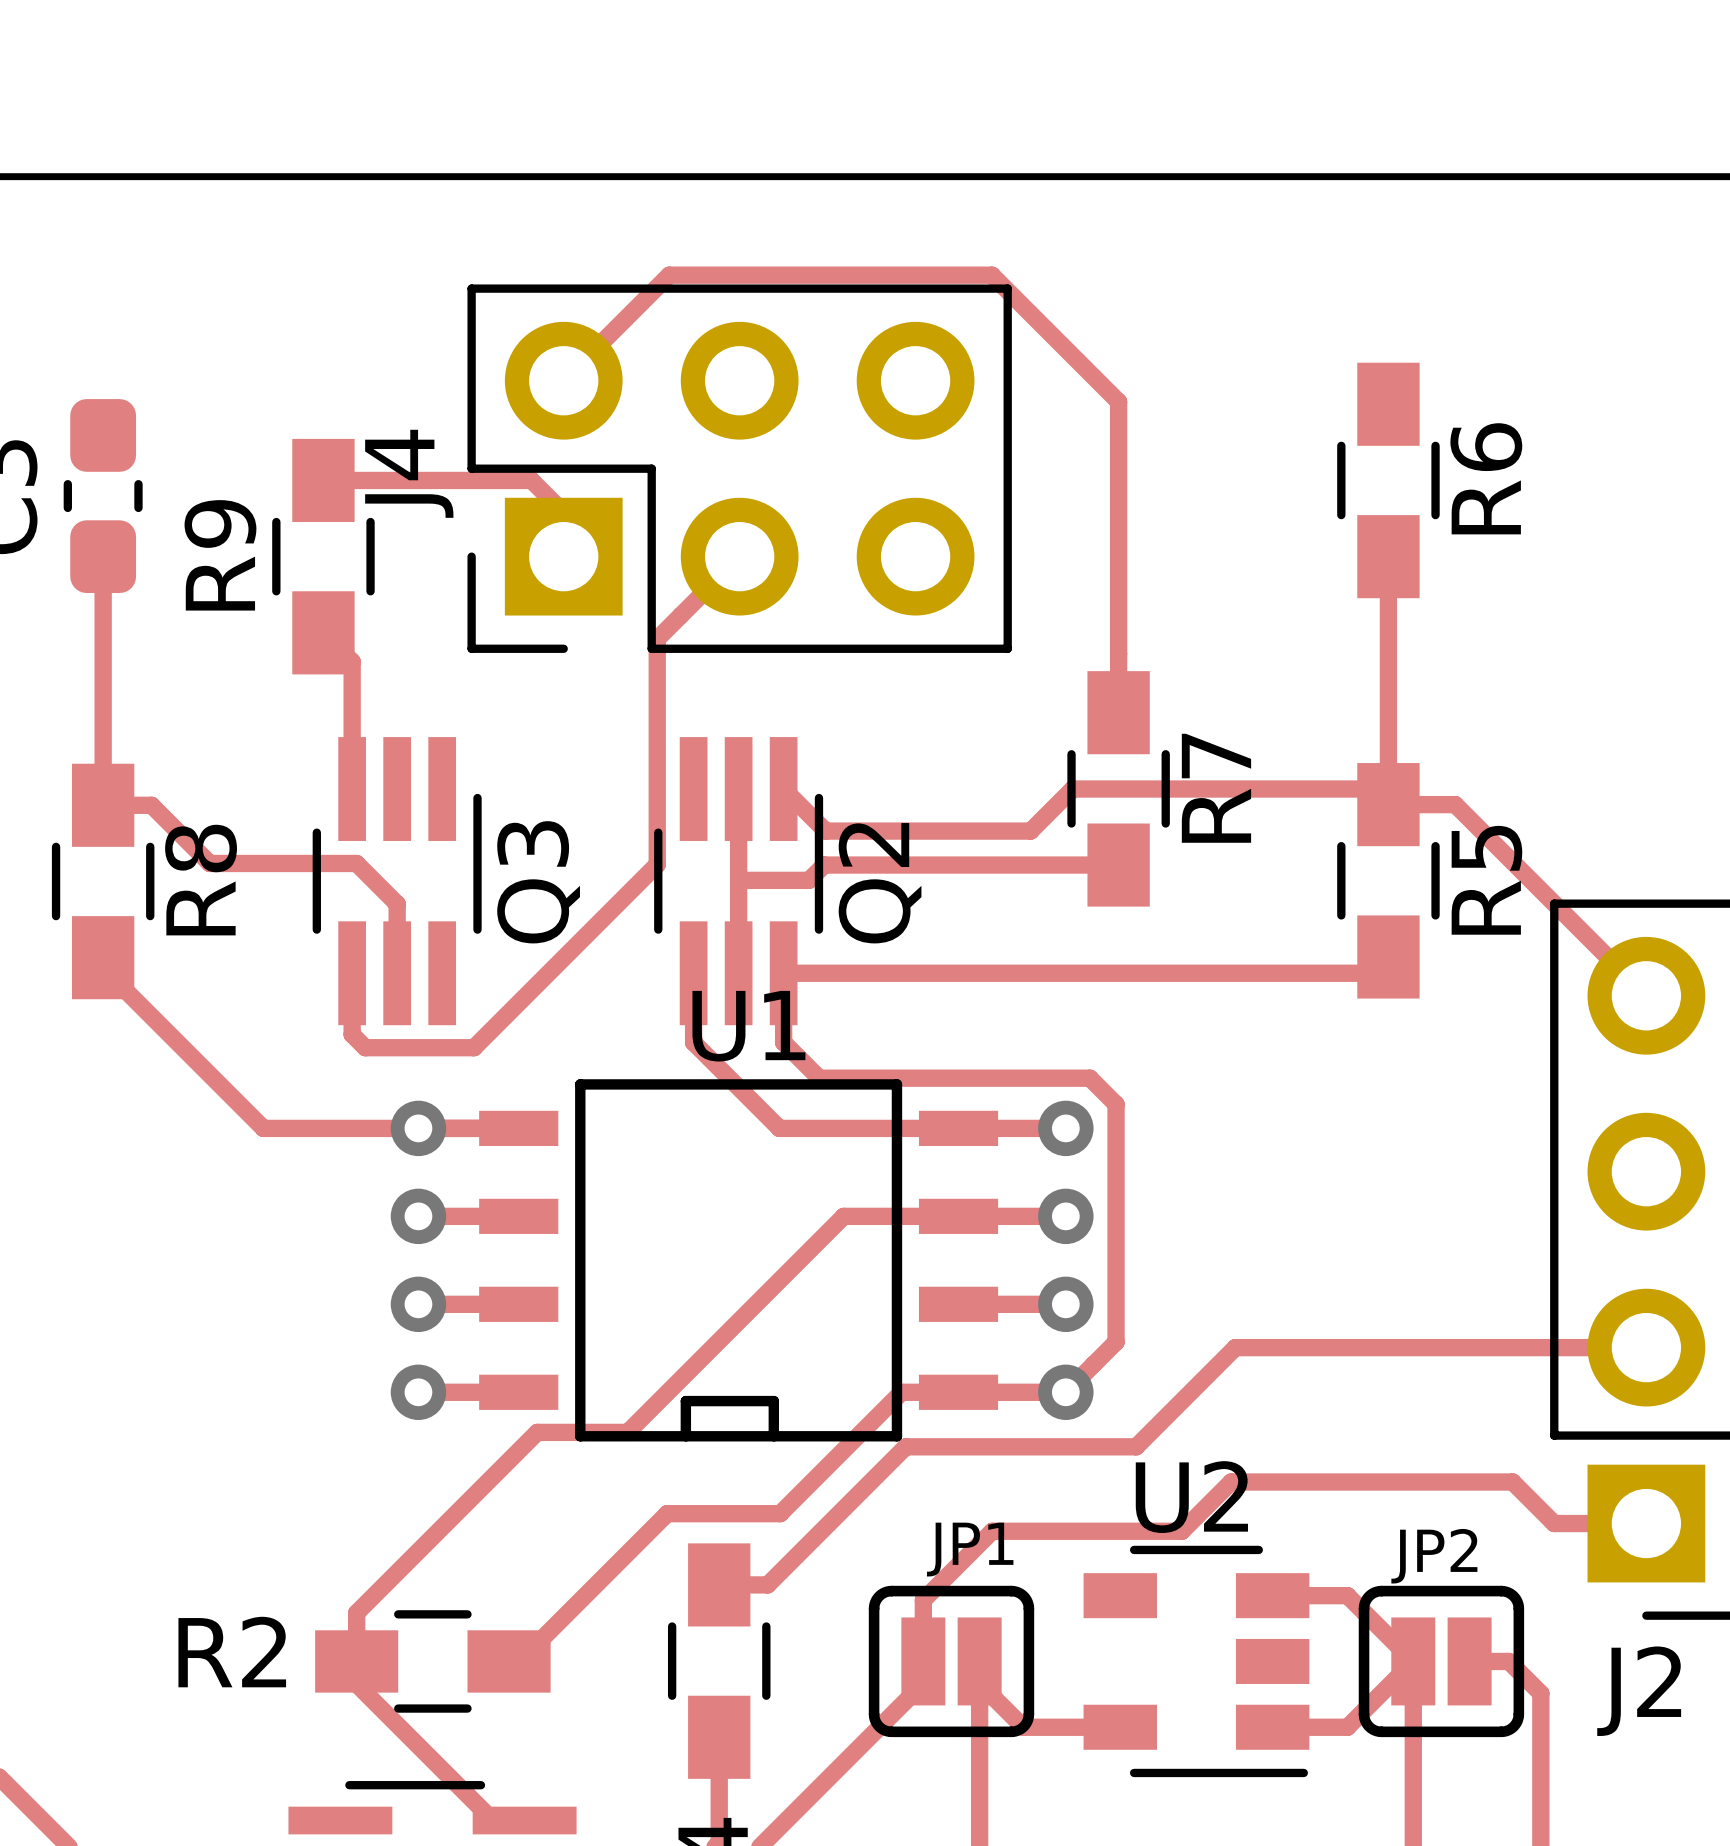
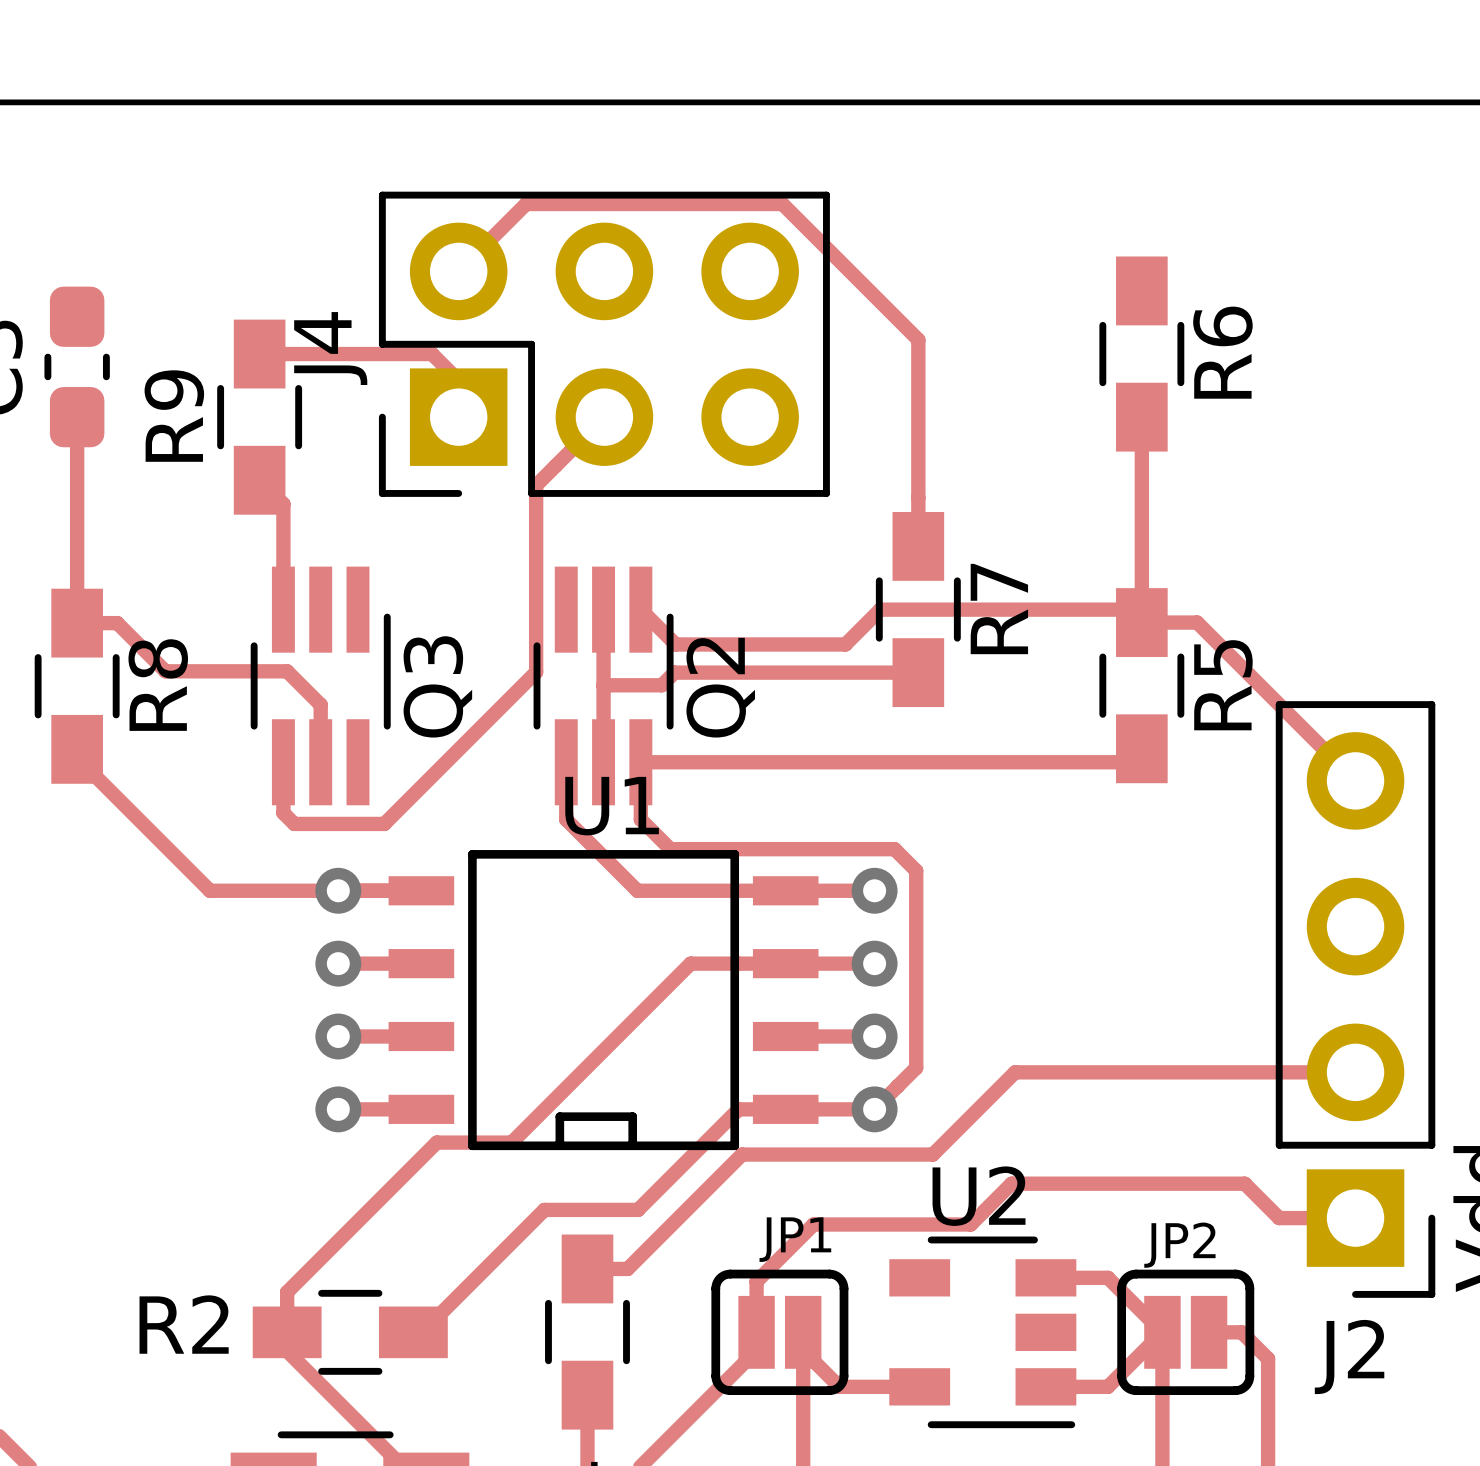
track: (645, 299) (669, 275) (991, 275) (1118, 401) (1118, 463) -> (526, 204) (782, 204) (918, 339)

